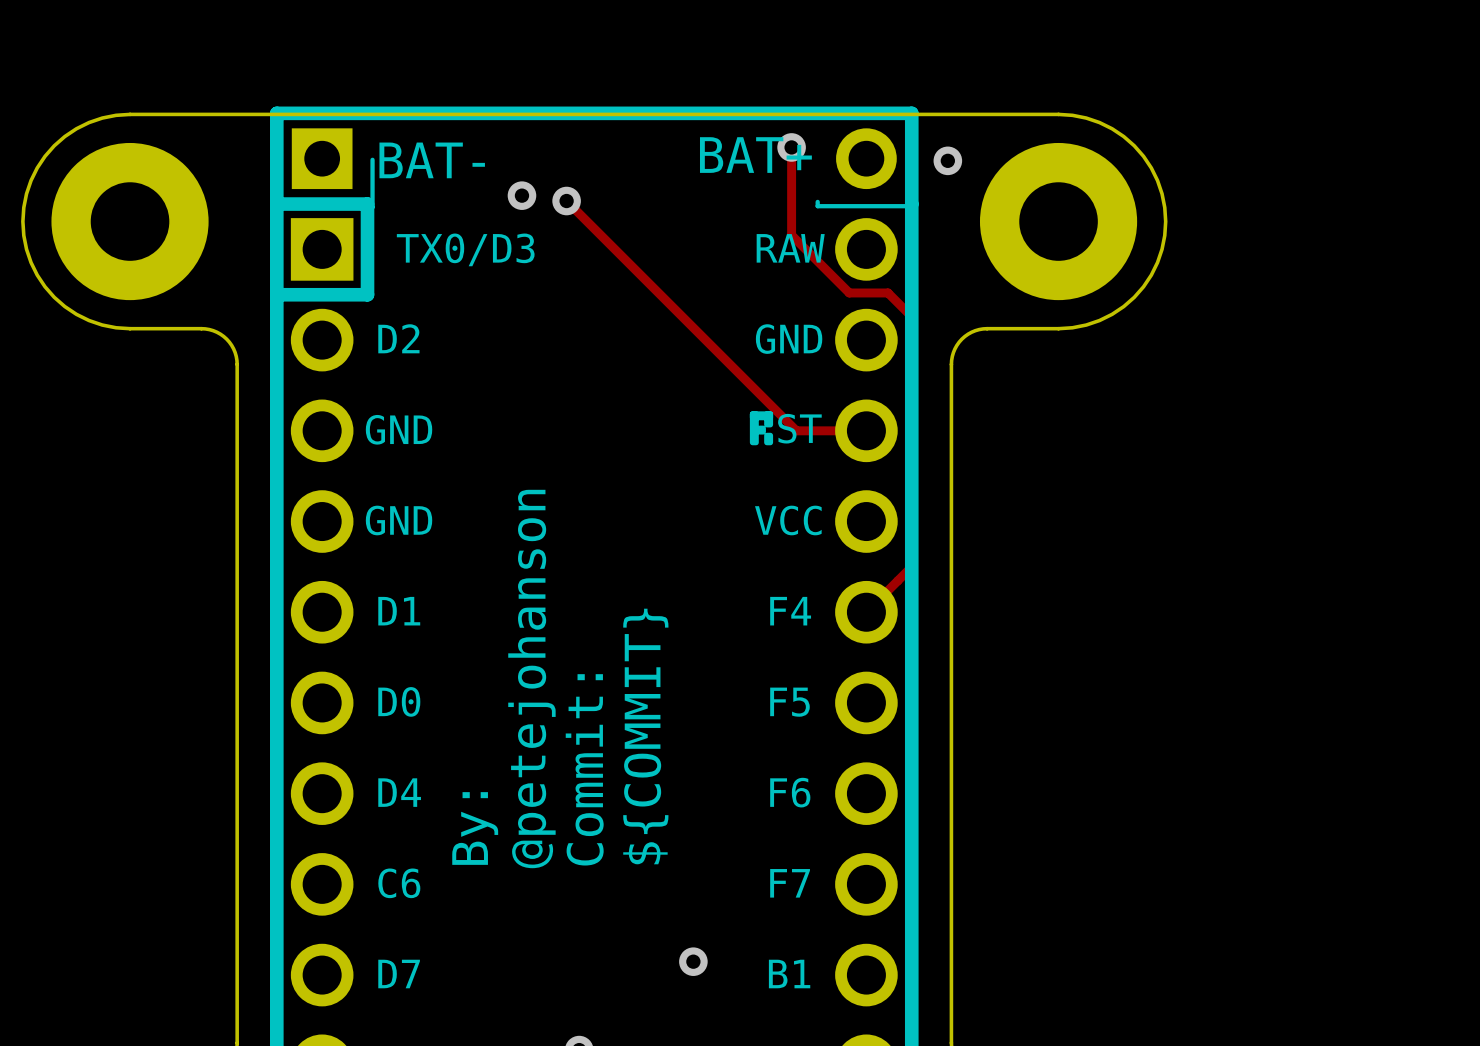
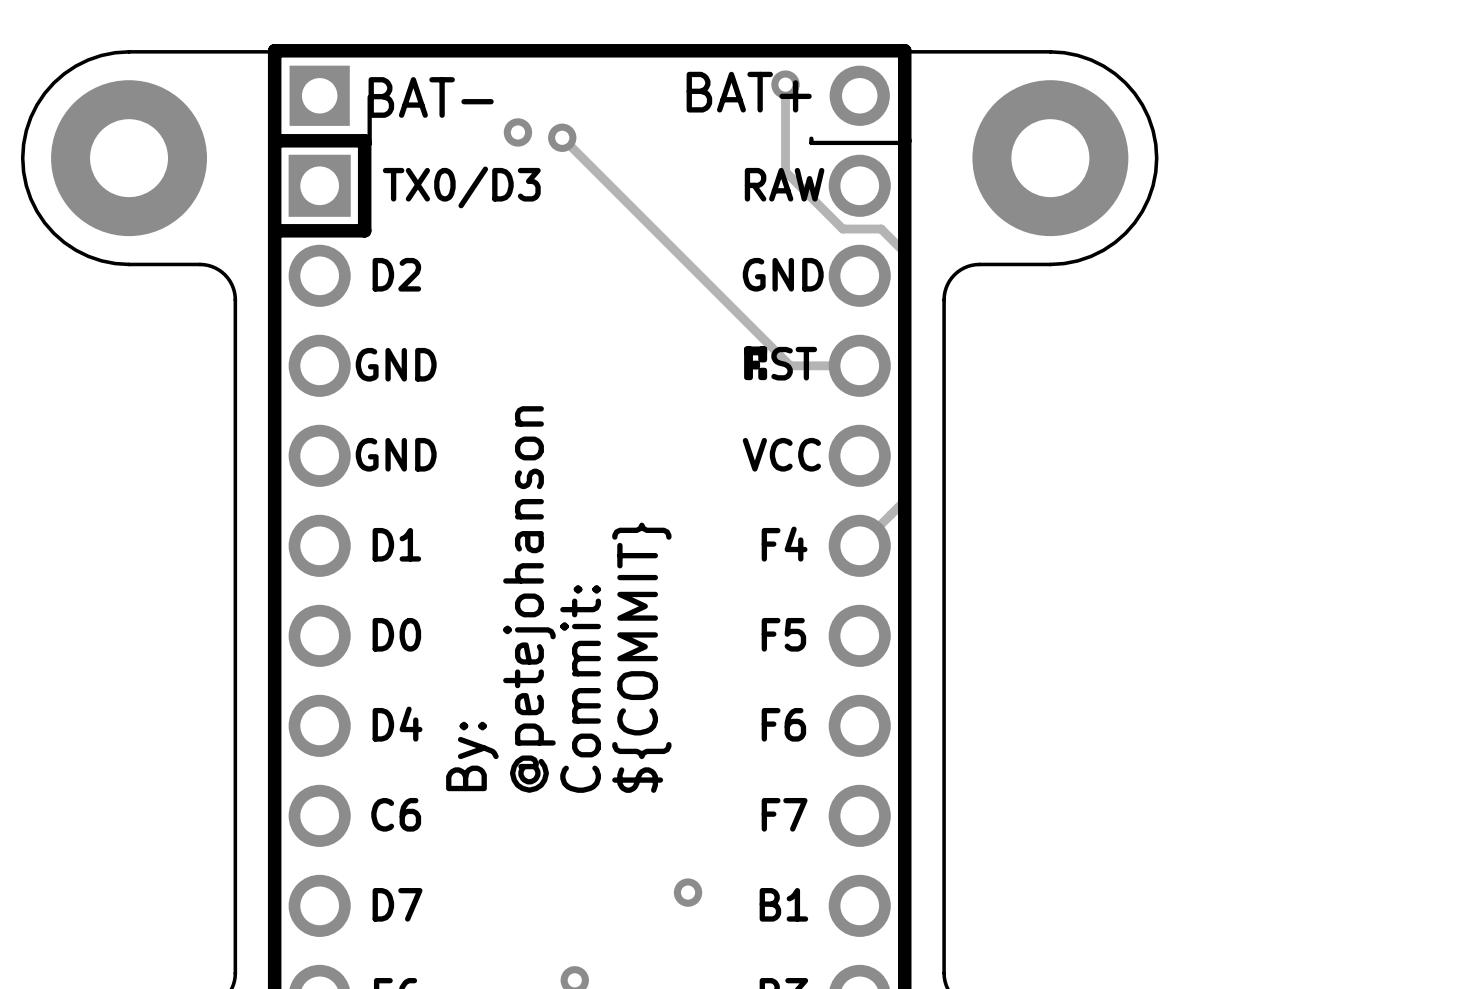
via: (947, 160) -> none

